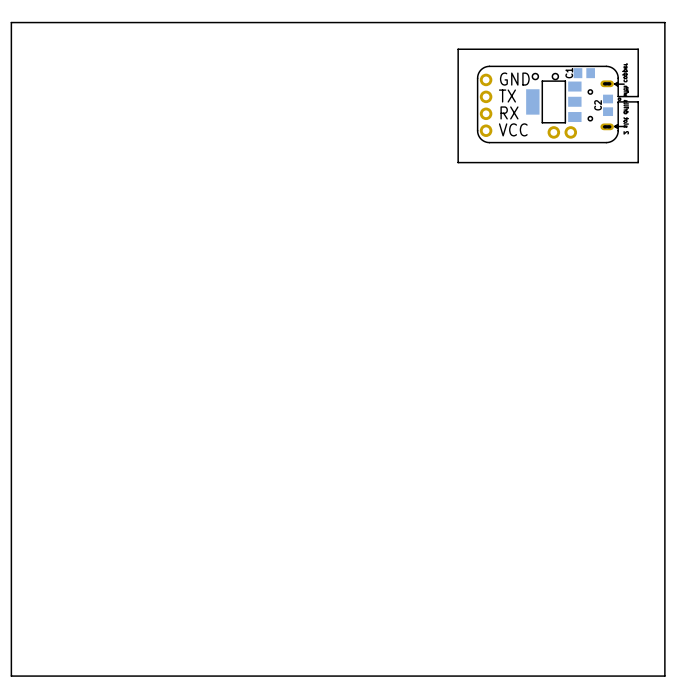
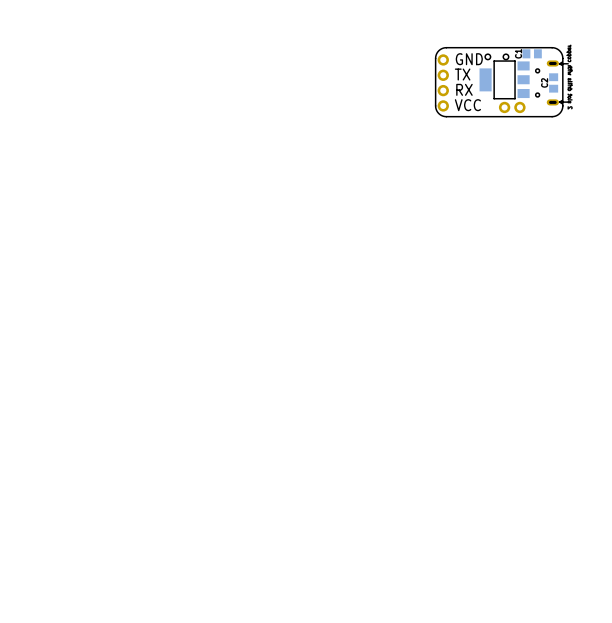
board edge: (664, 22) (11, 22) (11, 676) (664, 676) (664, 22) -> none
board edge: (618, 96) (638, 96) (638, 49) (458, 49) (458, 162) (638, 162) (638, 101) (618, 101) -> (562, 75) (562, 79)
hole: (619, 99) -> none

